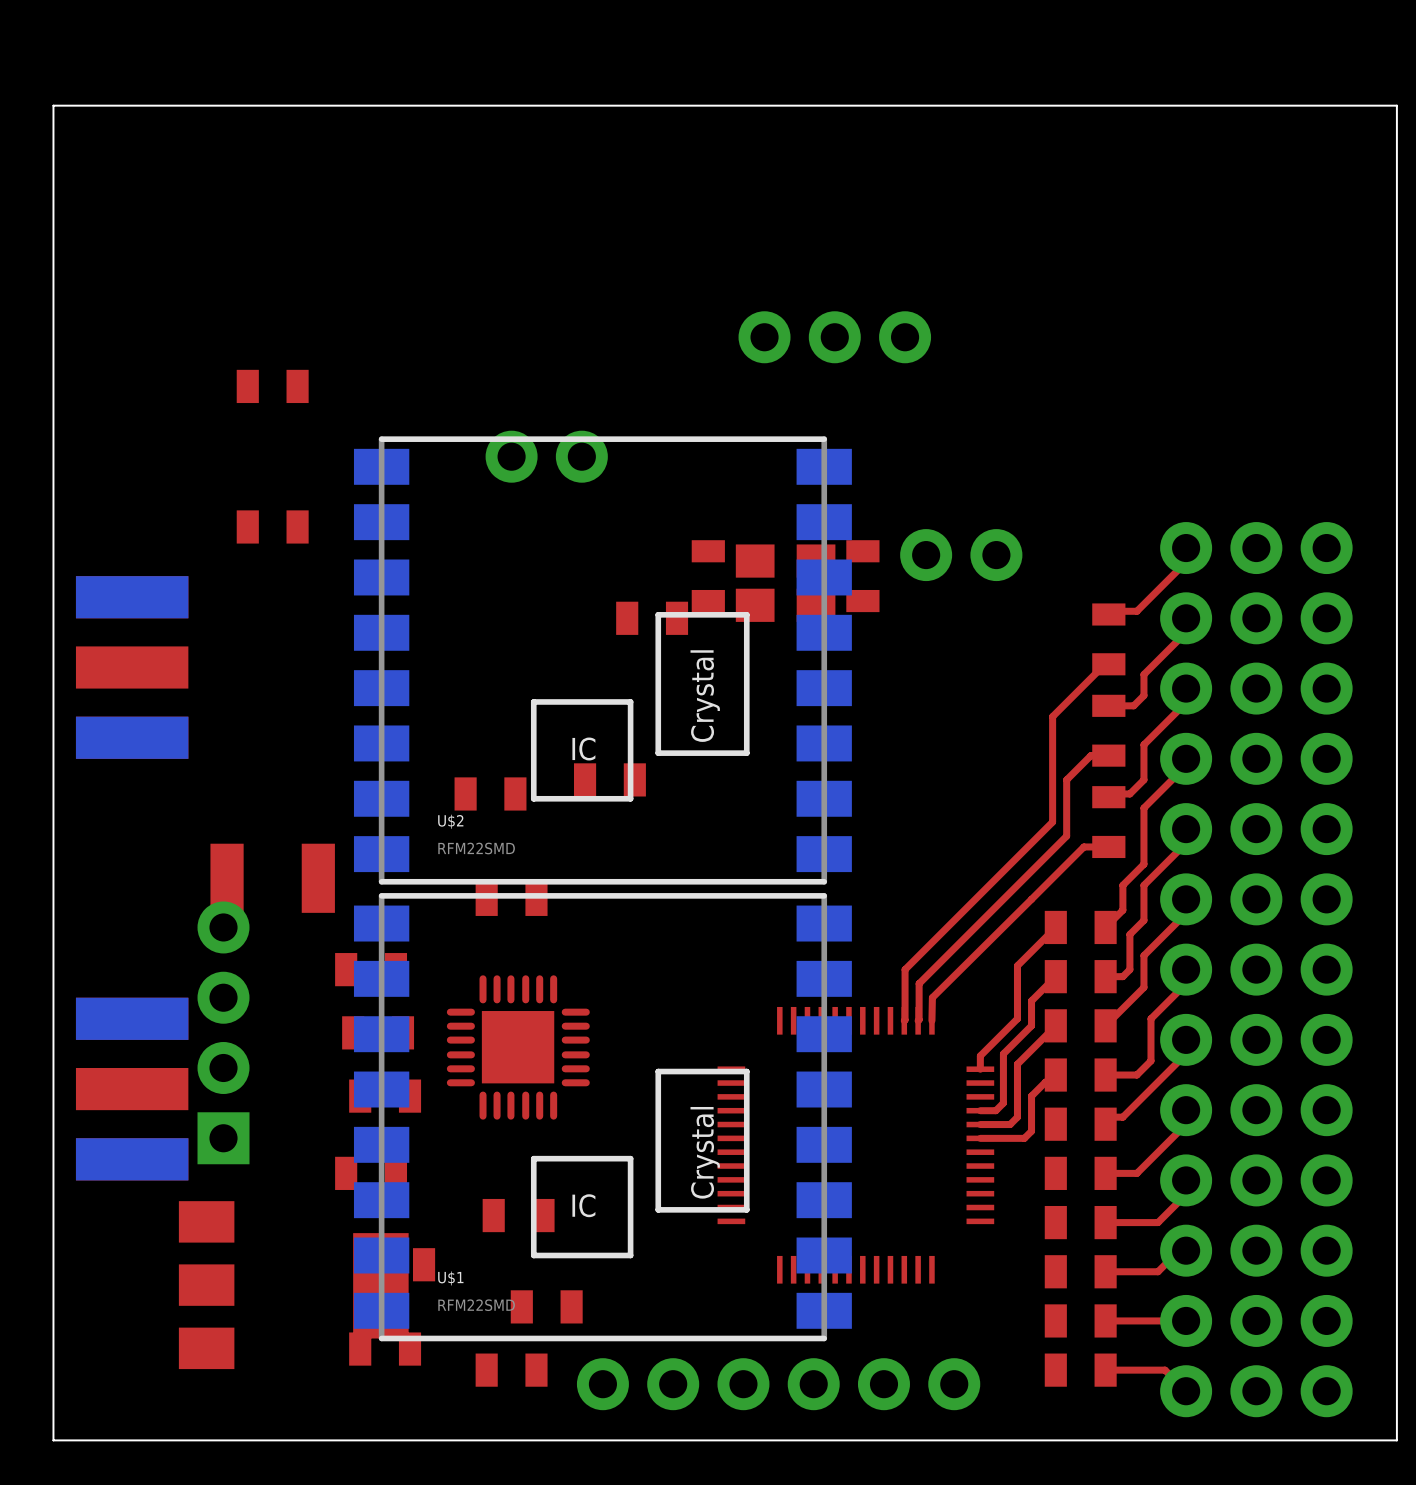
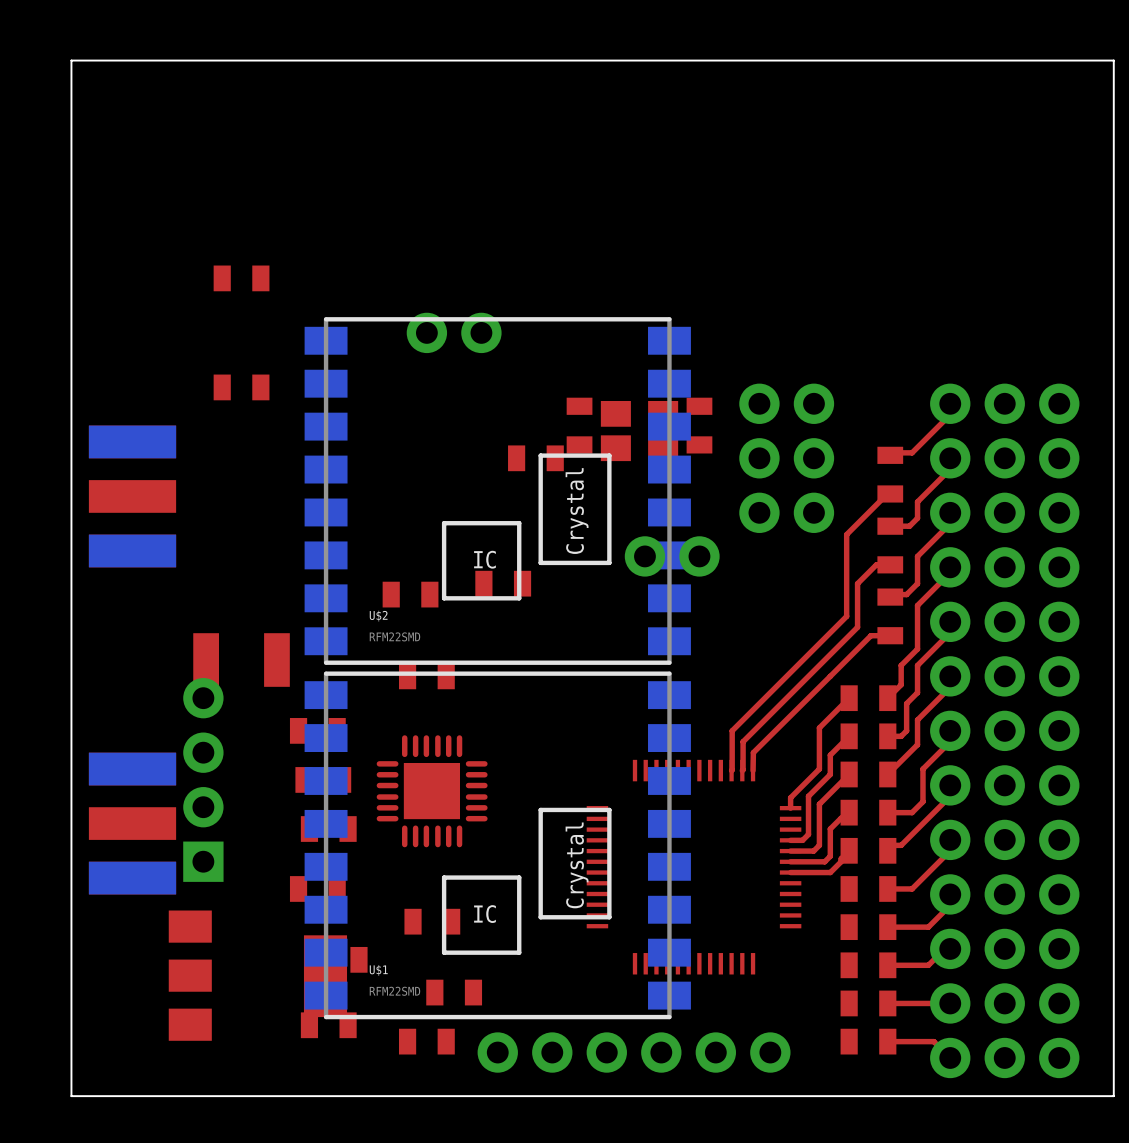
part: (834, 337) -> none
part position: (961, 555) -> (672, 556)
part: none -> (759, 458)
part: none -> (813, 458)
top track: none -> (849, 850) (830, 872) (790, 872)

